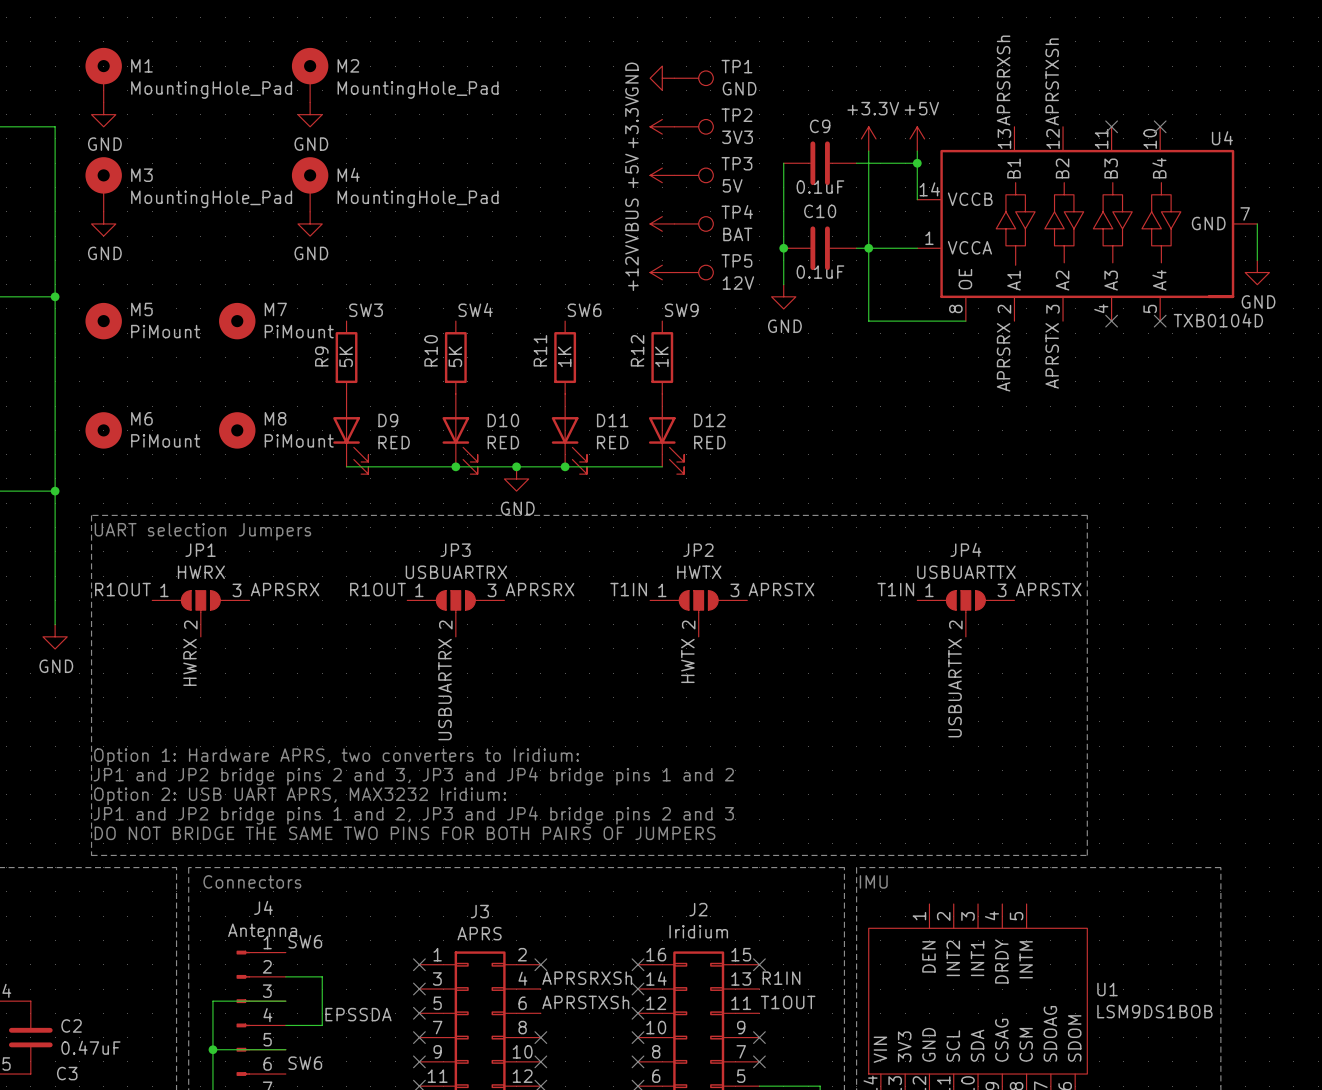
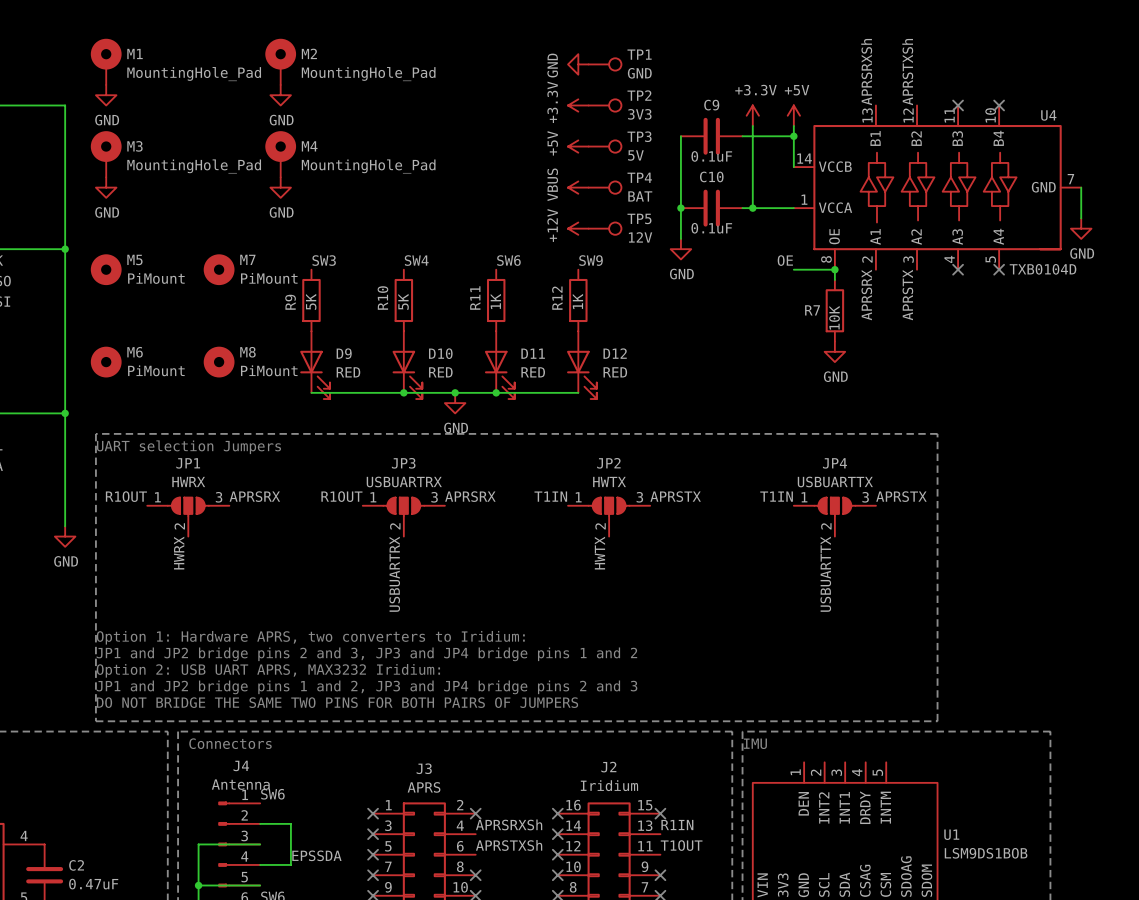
wire: (868, 248) (868, 321) (917, 321) -> none
label: none -> OE (785, 260)
wire: none -> (834, 269) (834, 279)
junction: none -> (834, 269)
R7: none -> 10K (834, 310)
power symbol: none -> GND (834, 351)

